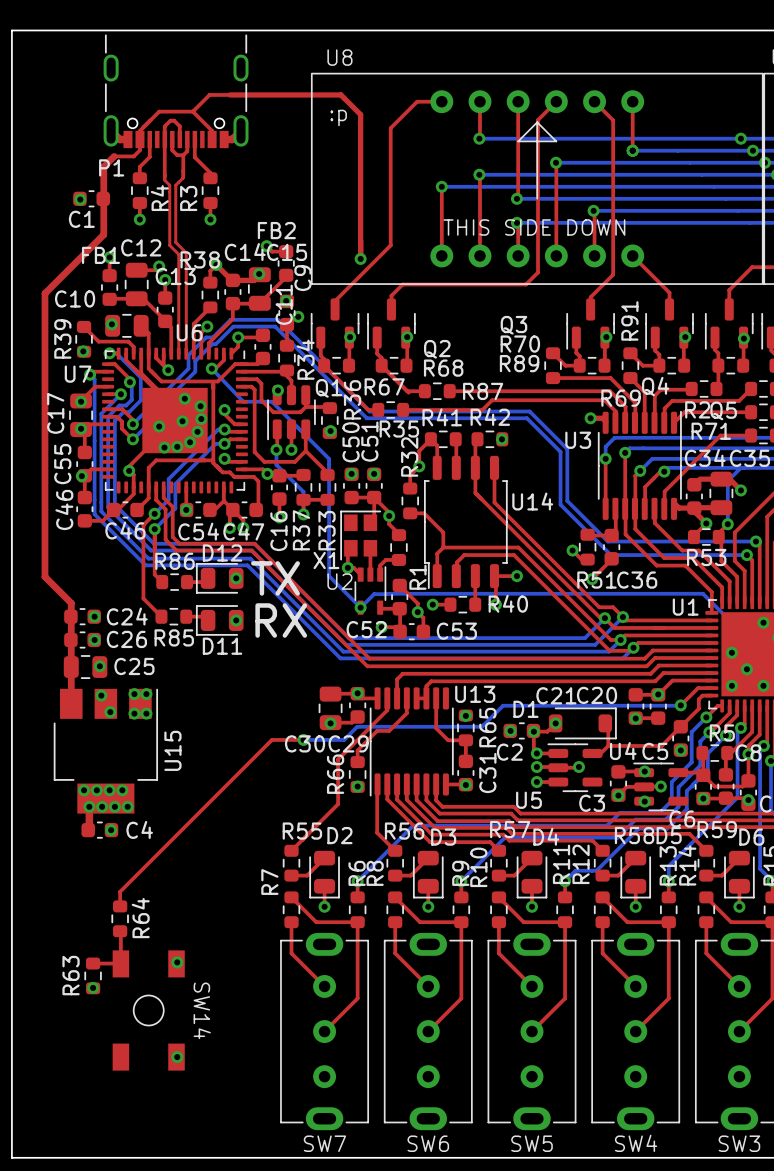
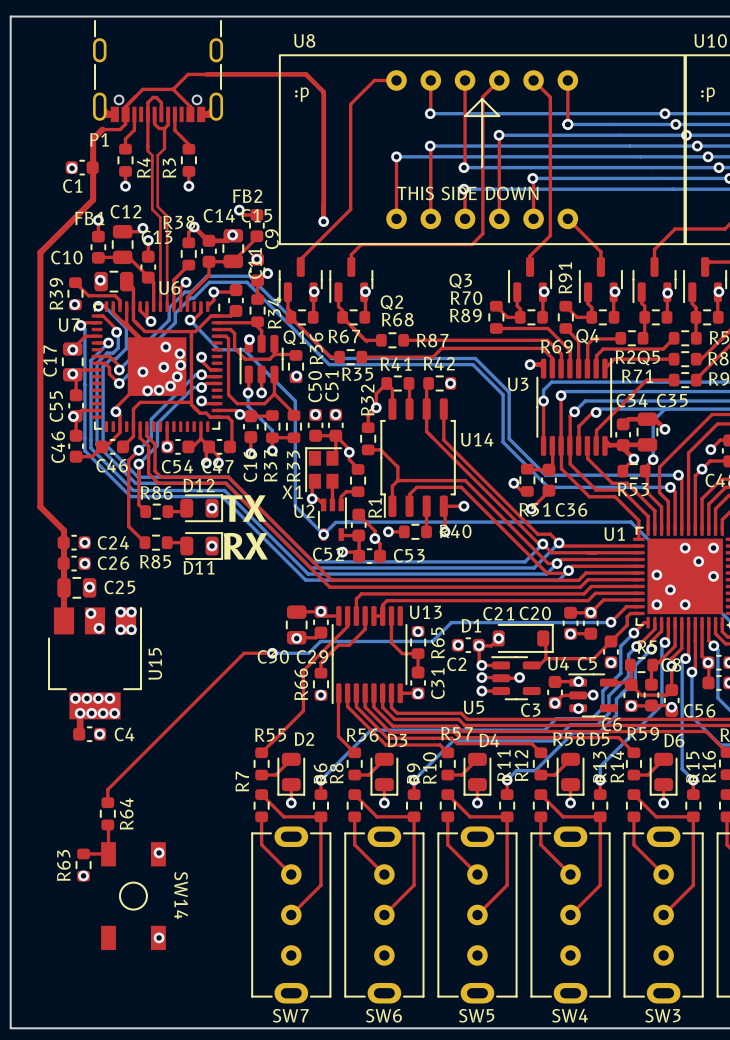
D12 rotation: 0° (219, 578) -> 180° (201, 508)
D11 rotation: 0° (219, 620) -> 180° (201, 546)

